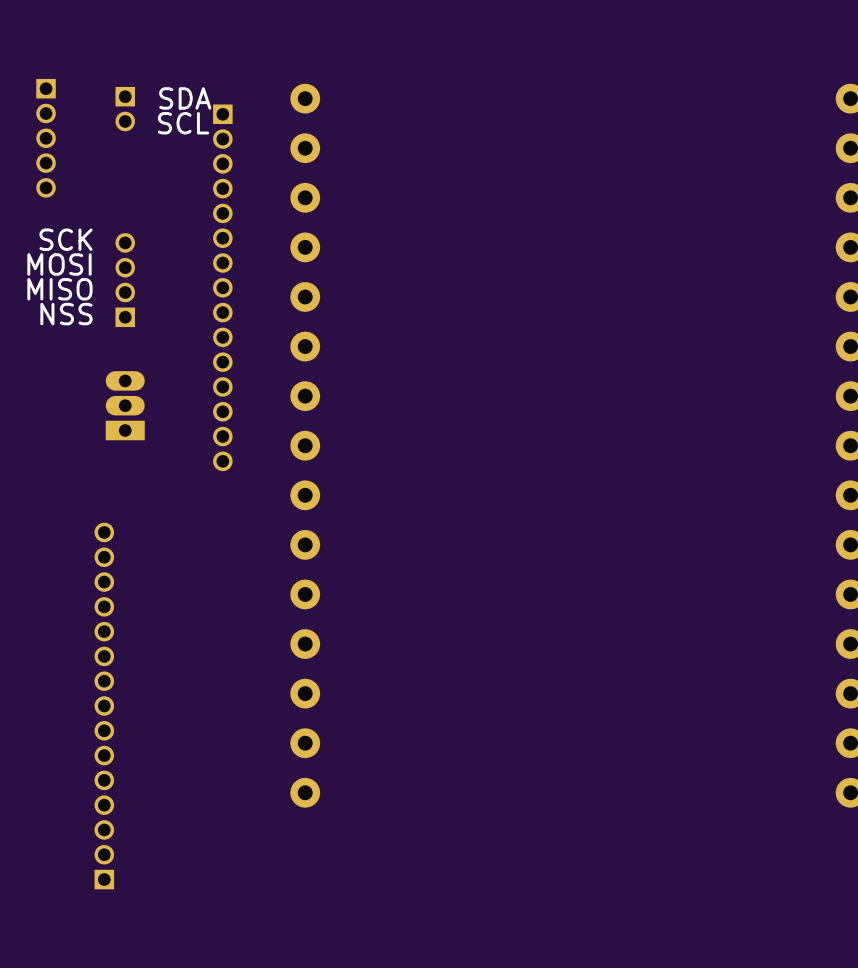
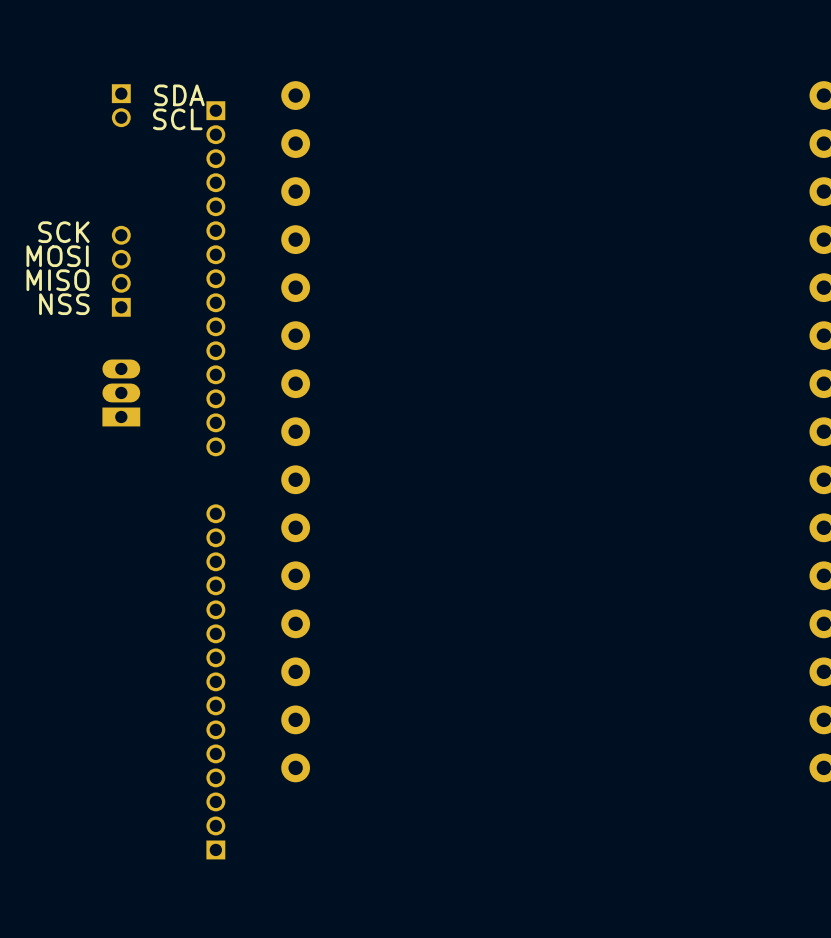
part: (46, 138) -> none
part position: (104, 706) -> (215, 681)

